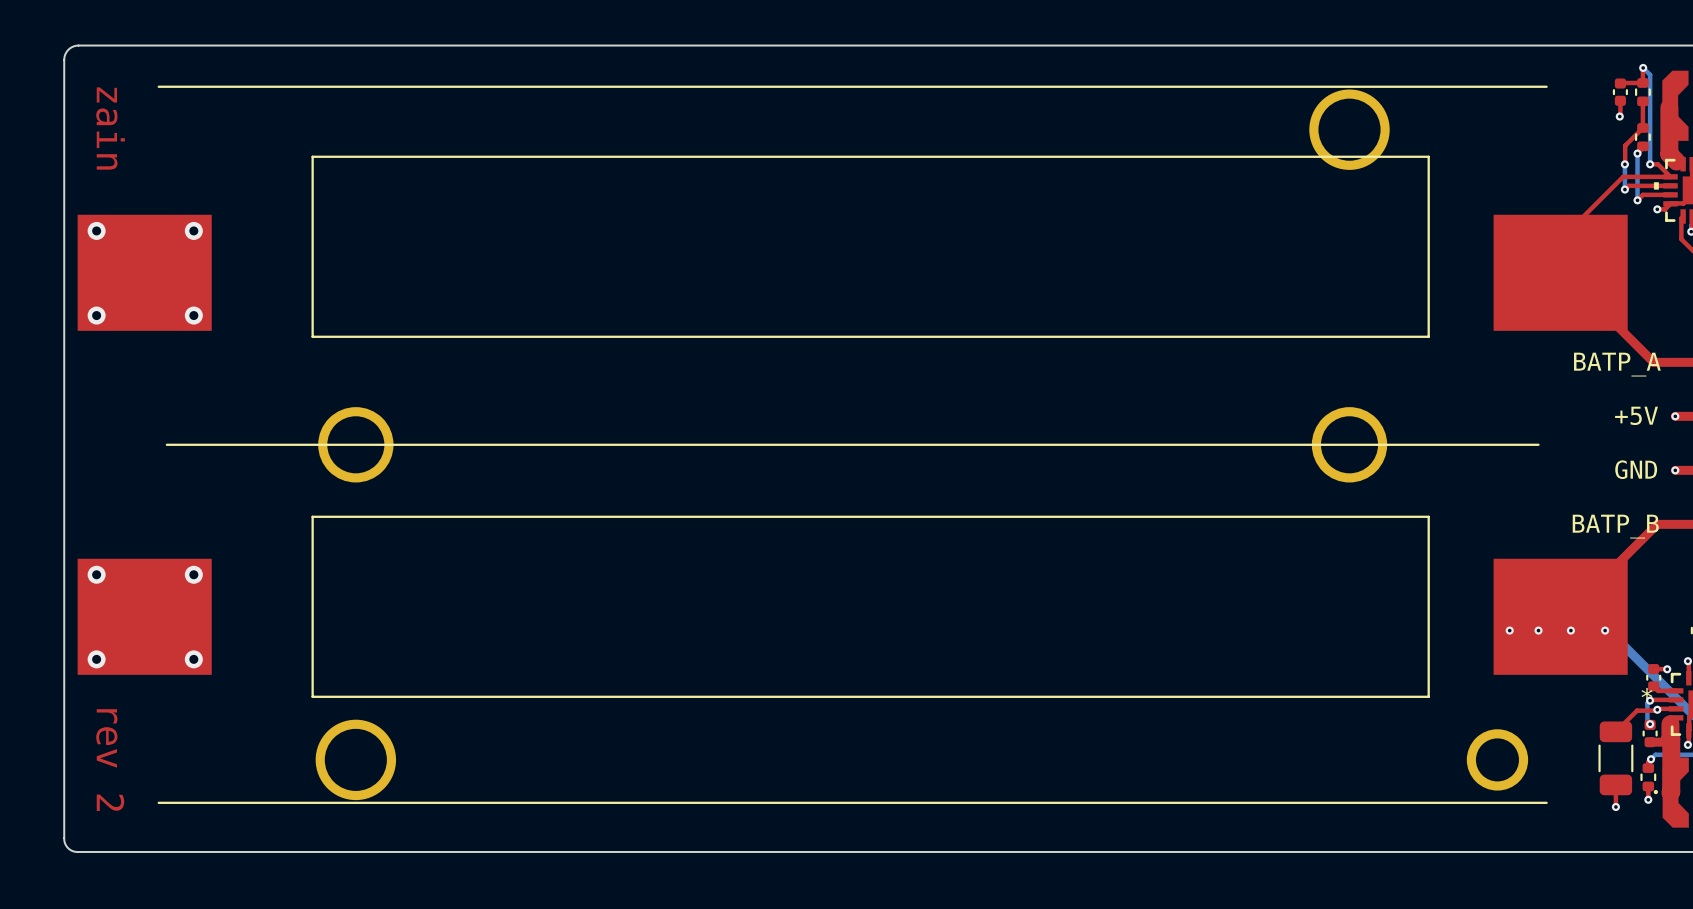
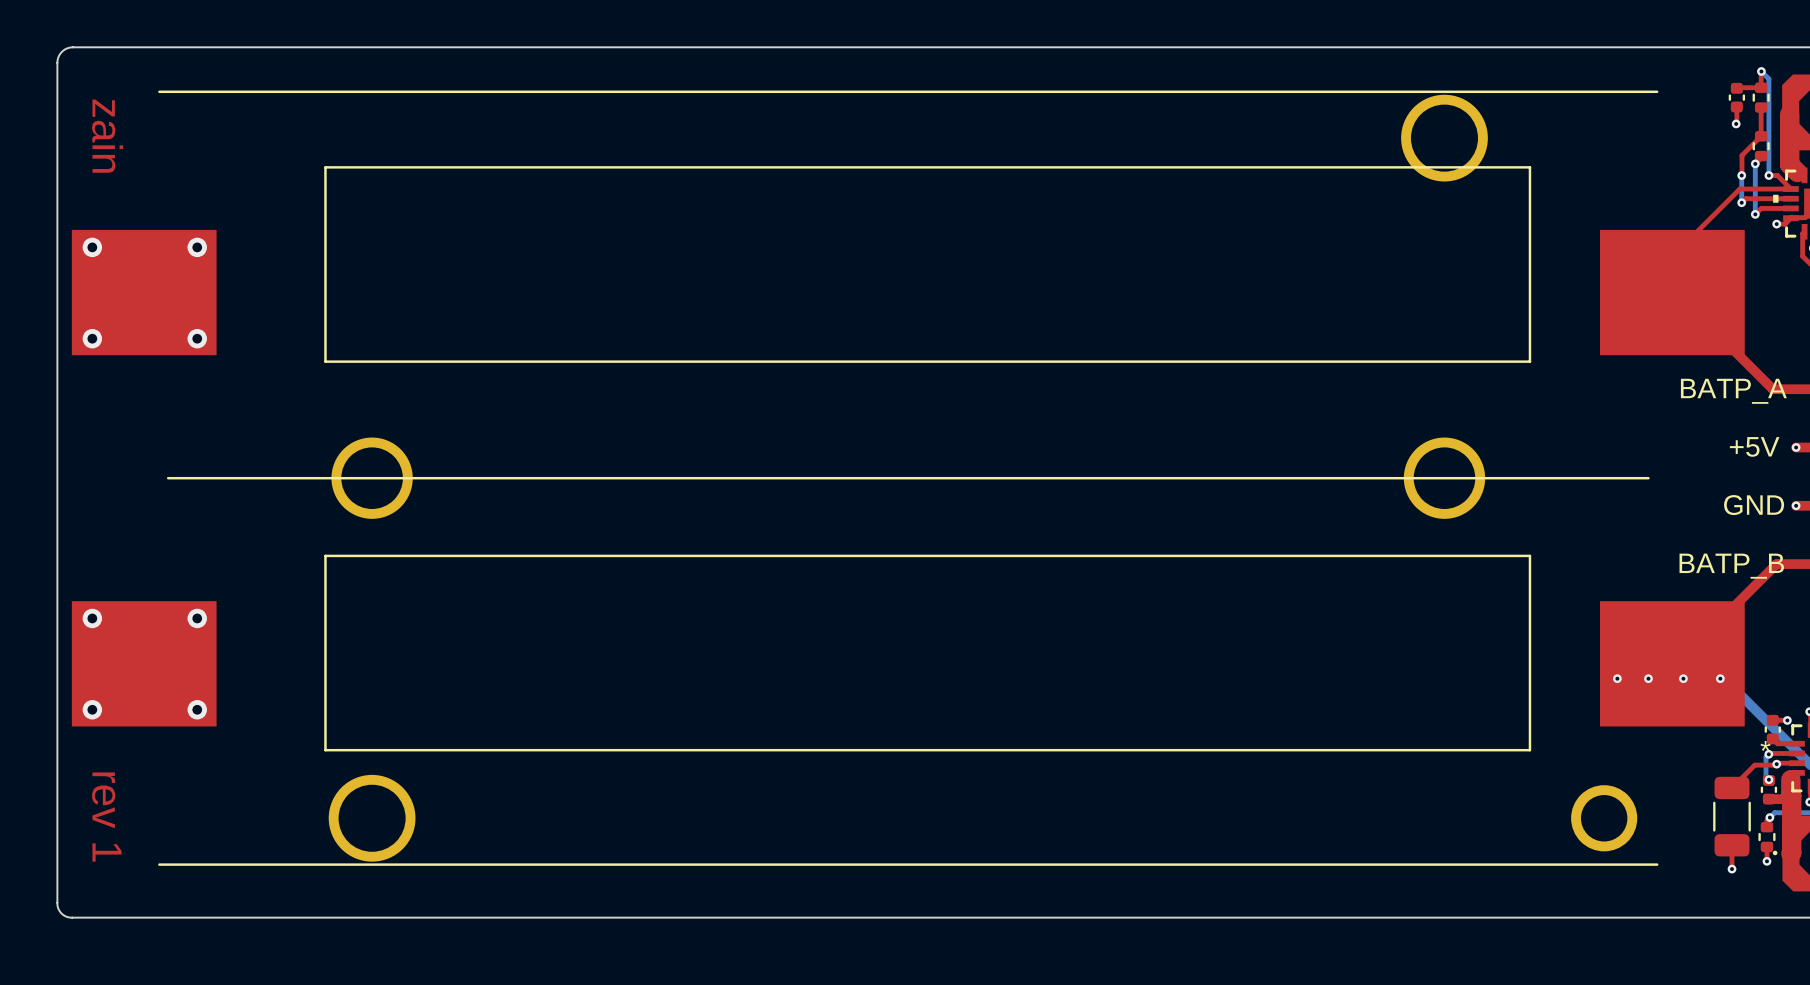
text: rev 2 (110, 760) -> rev 1 (106, 816)

